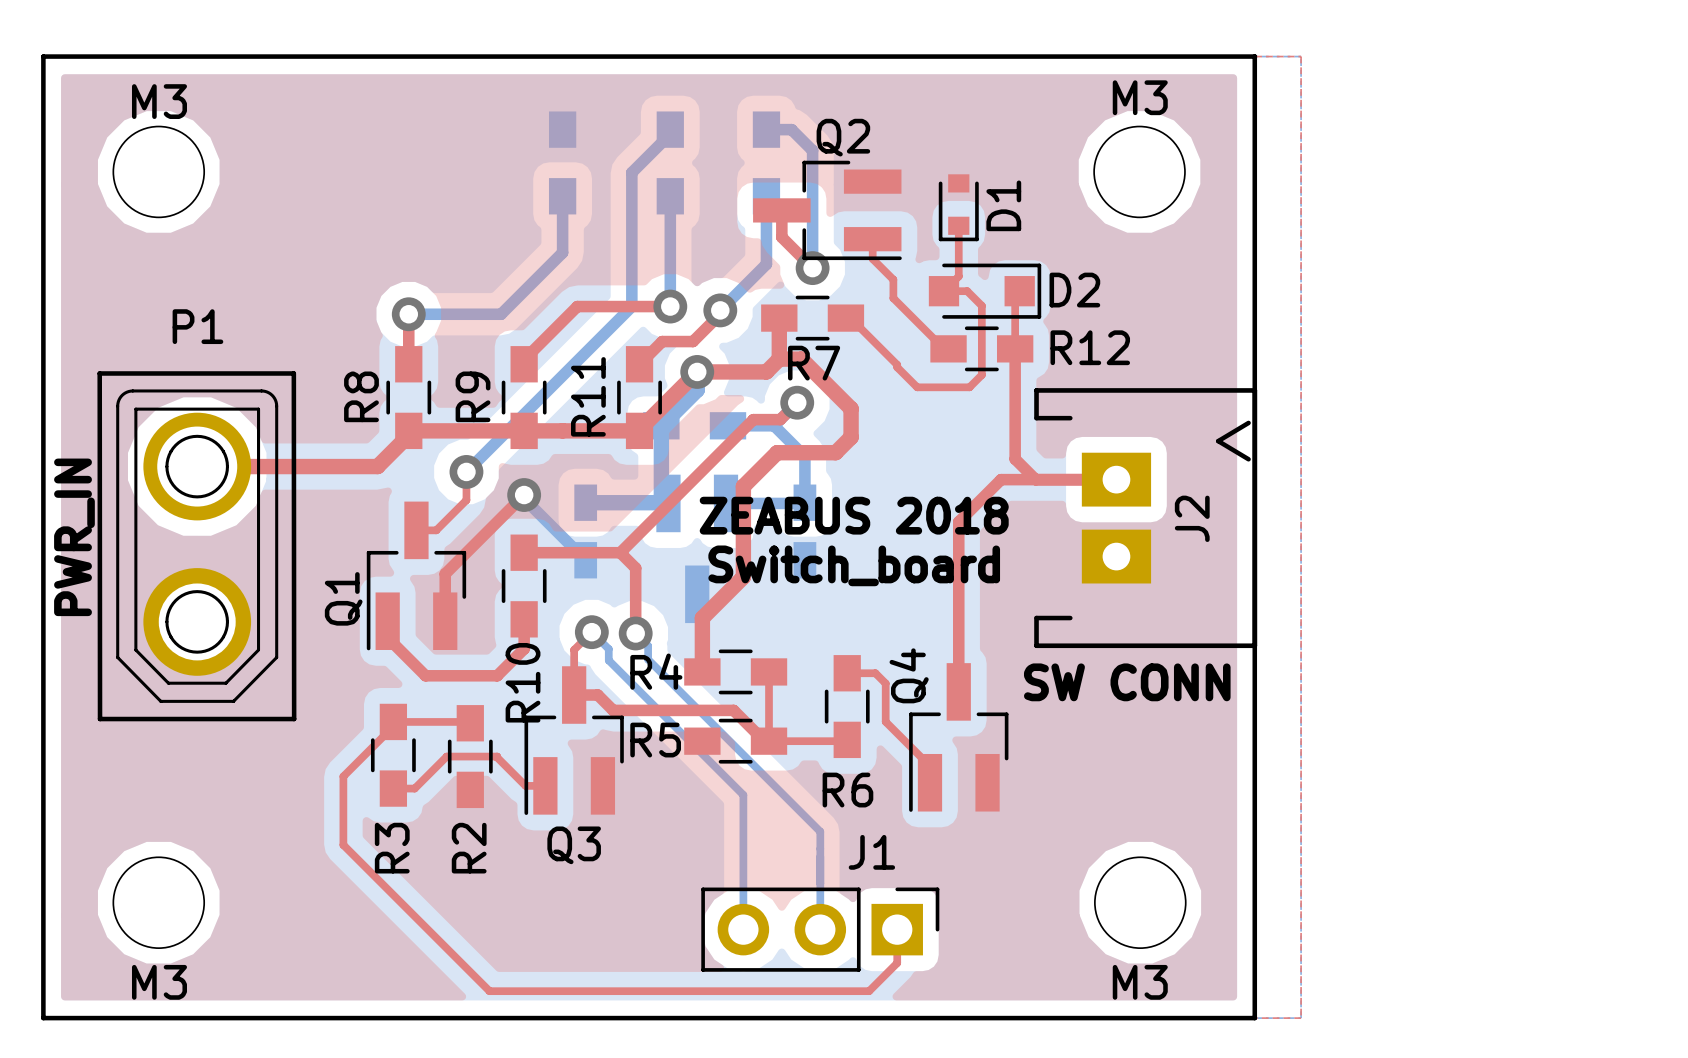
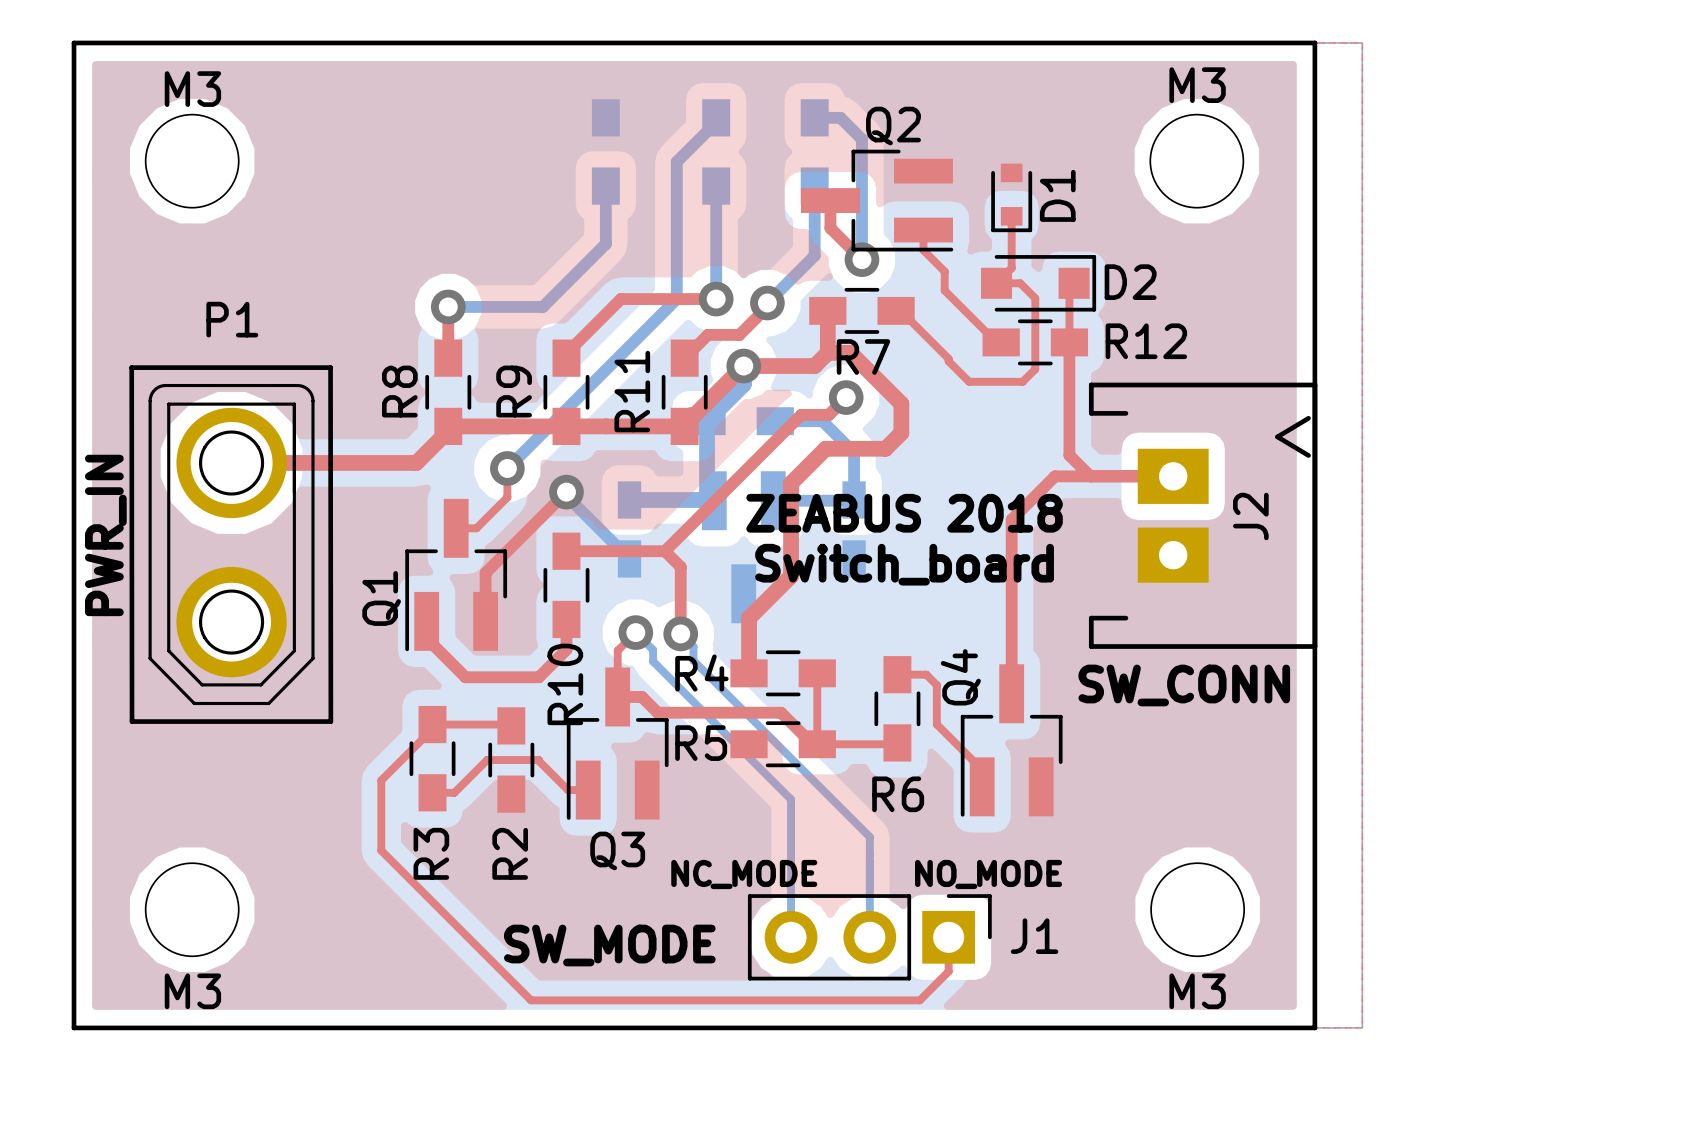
text: SW CONN (1127, 682) -> SW_CONN (1184, 685)
J1 name position: J1 (871, 852) -> J1 (1034, 936)
text: none -> NC_MODE (744, 874)
text: none -> NO_MODE (988, 874)
text: none -> SW_MODE (609, 945)

